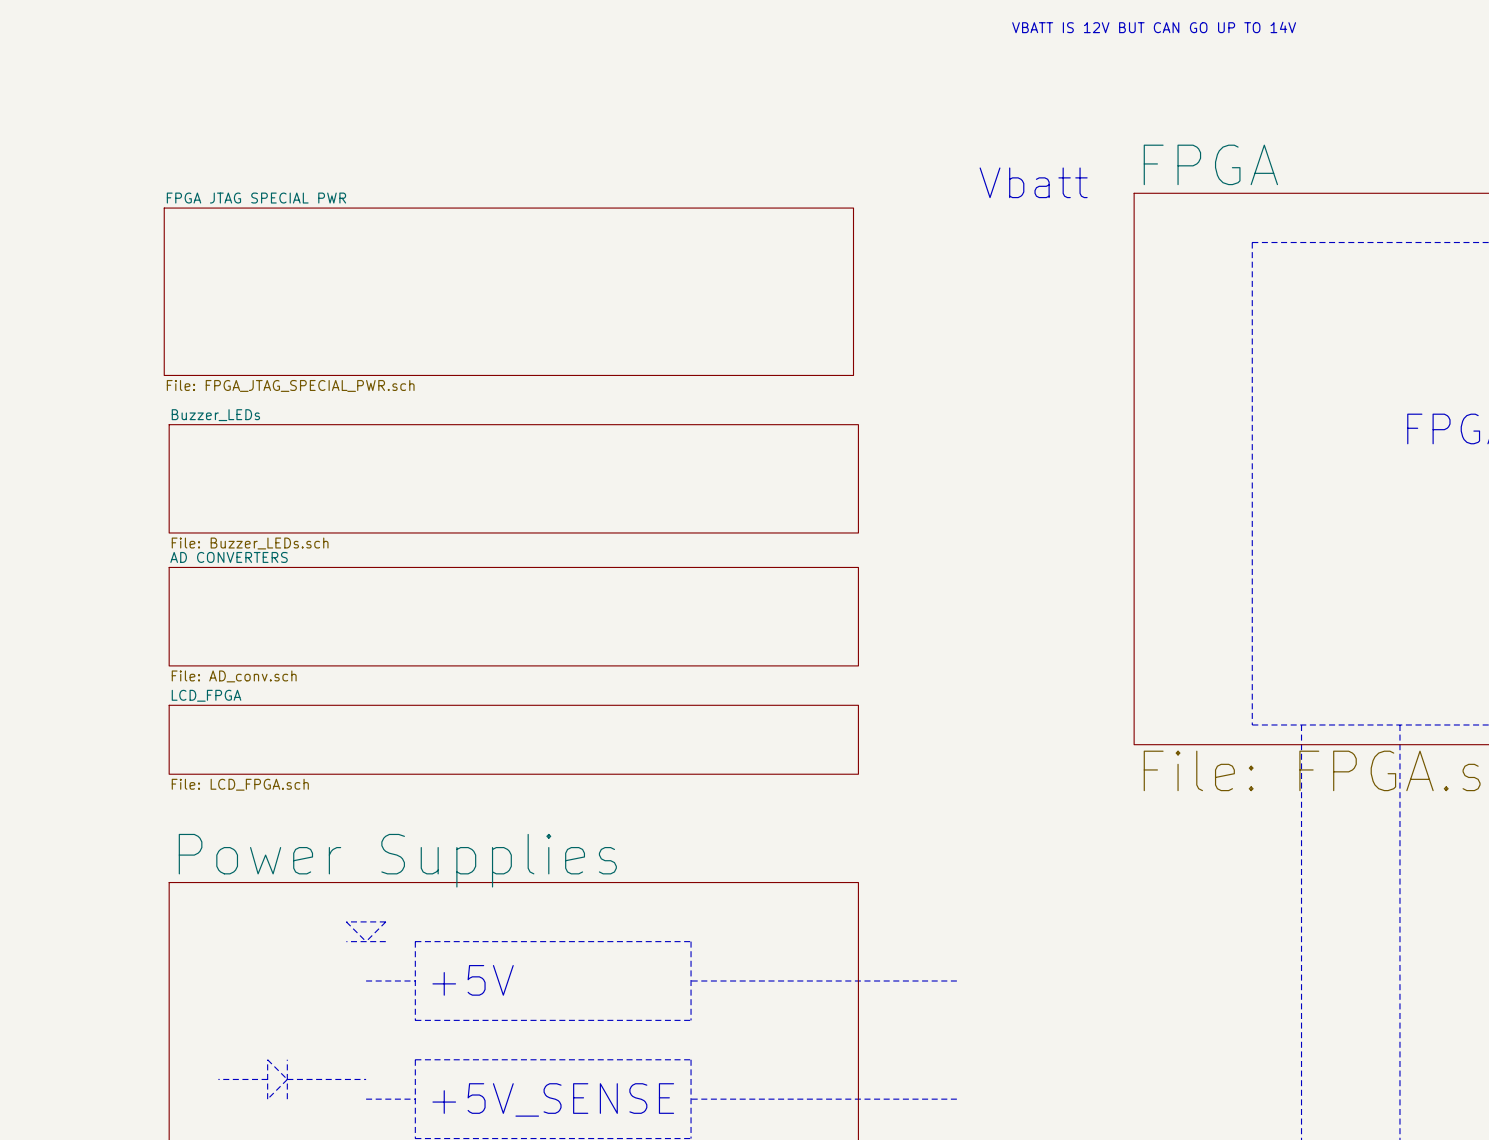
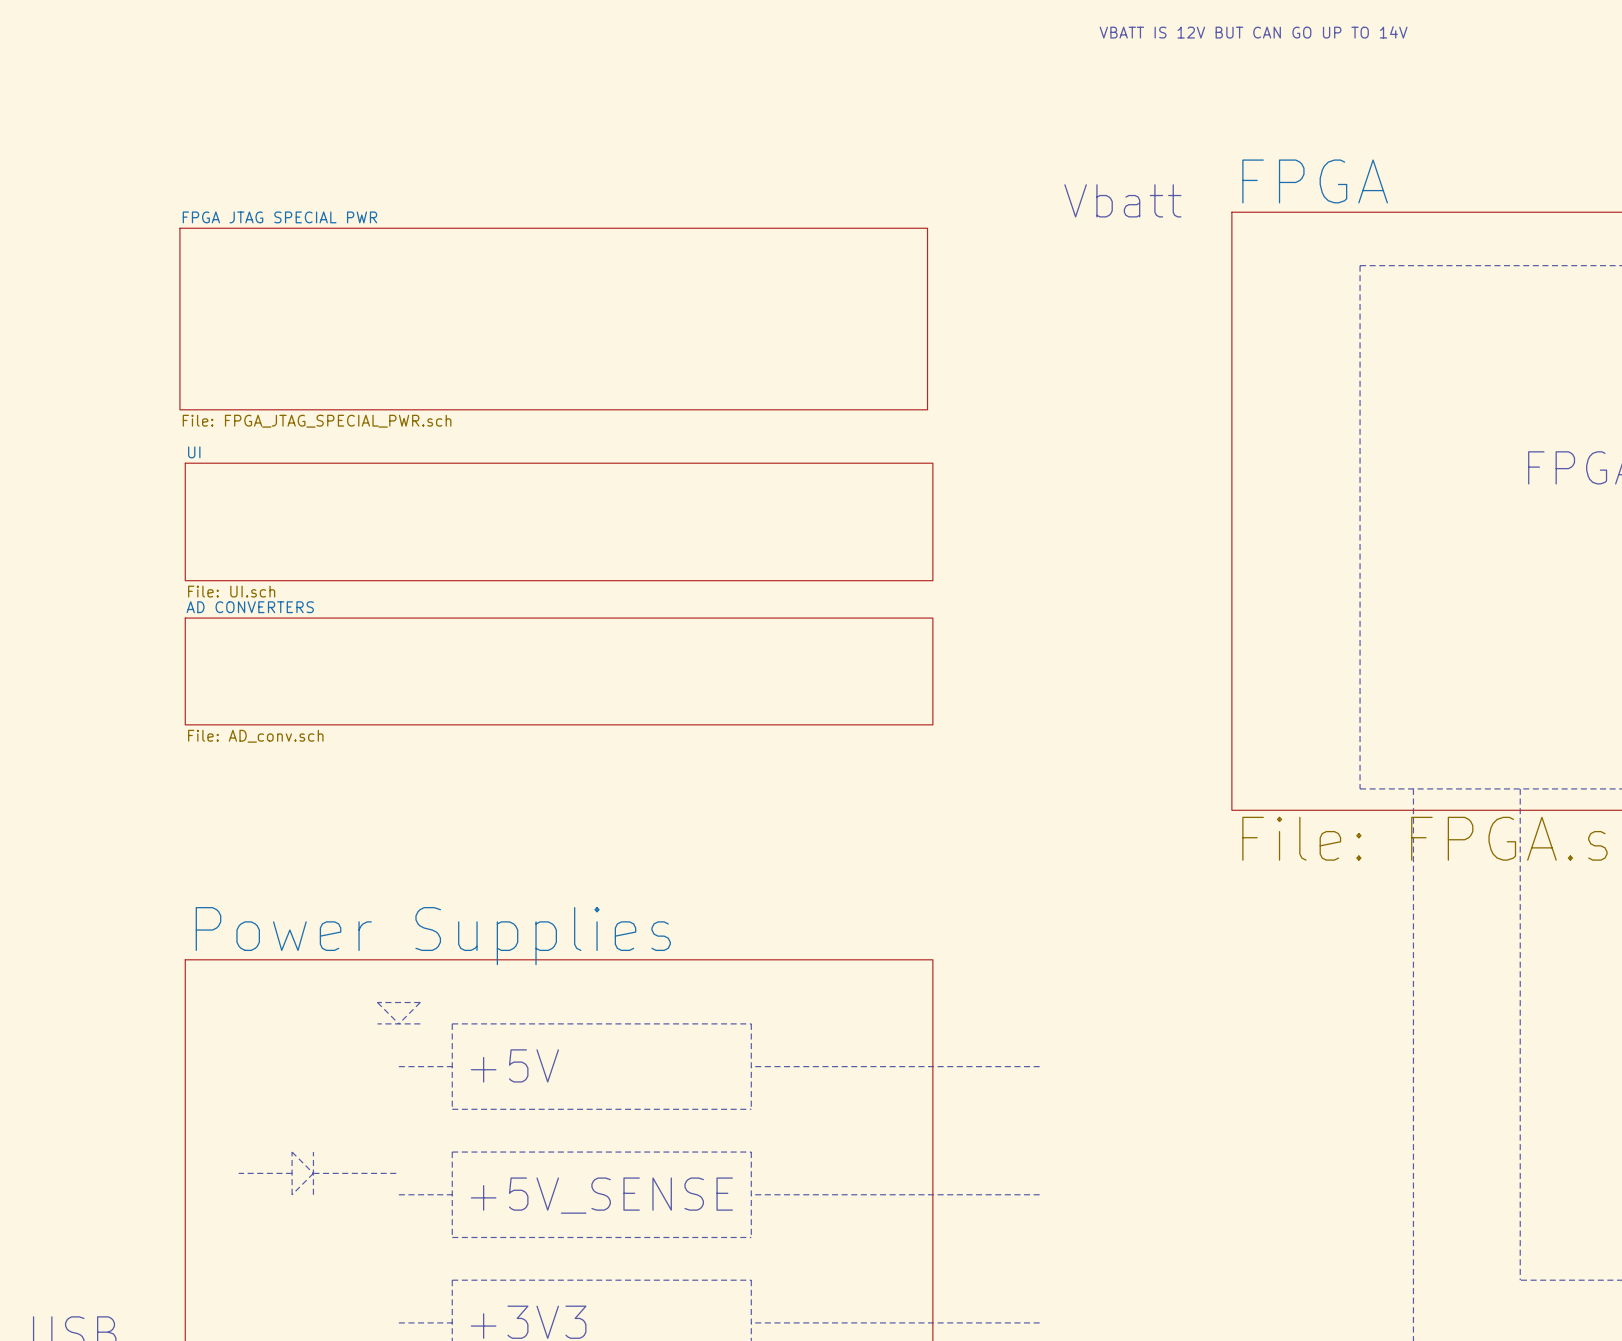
sheet Buzzer_LEDs name: Buzzer_LEDs (215, 415) -> UI (194, 452)
sheet Buzzer_LEDs value: File: Buzzer_LEDs.sch (250, 543) -> File: UI.sch (231, 591)
sheet LCD_FPGA: File: LCD_FPGA.sch (513, 739) -> none

